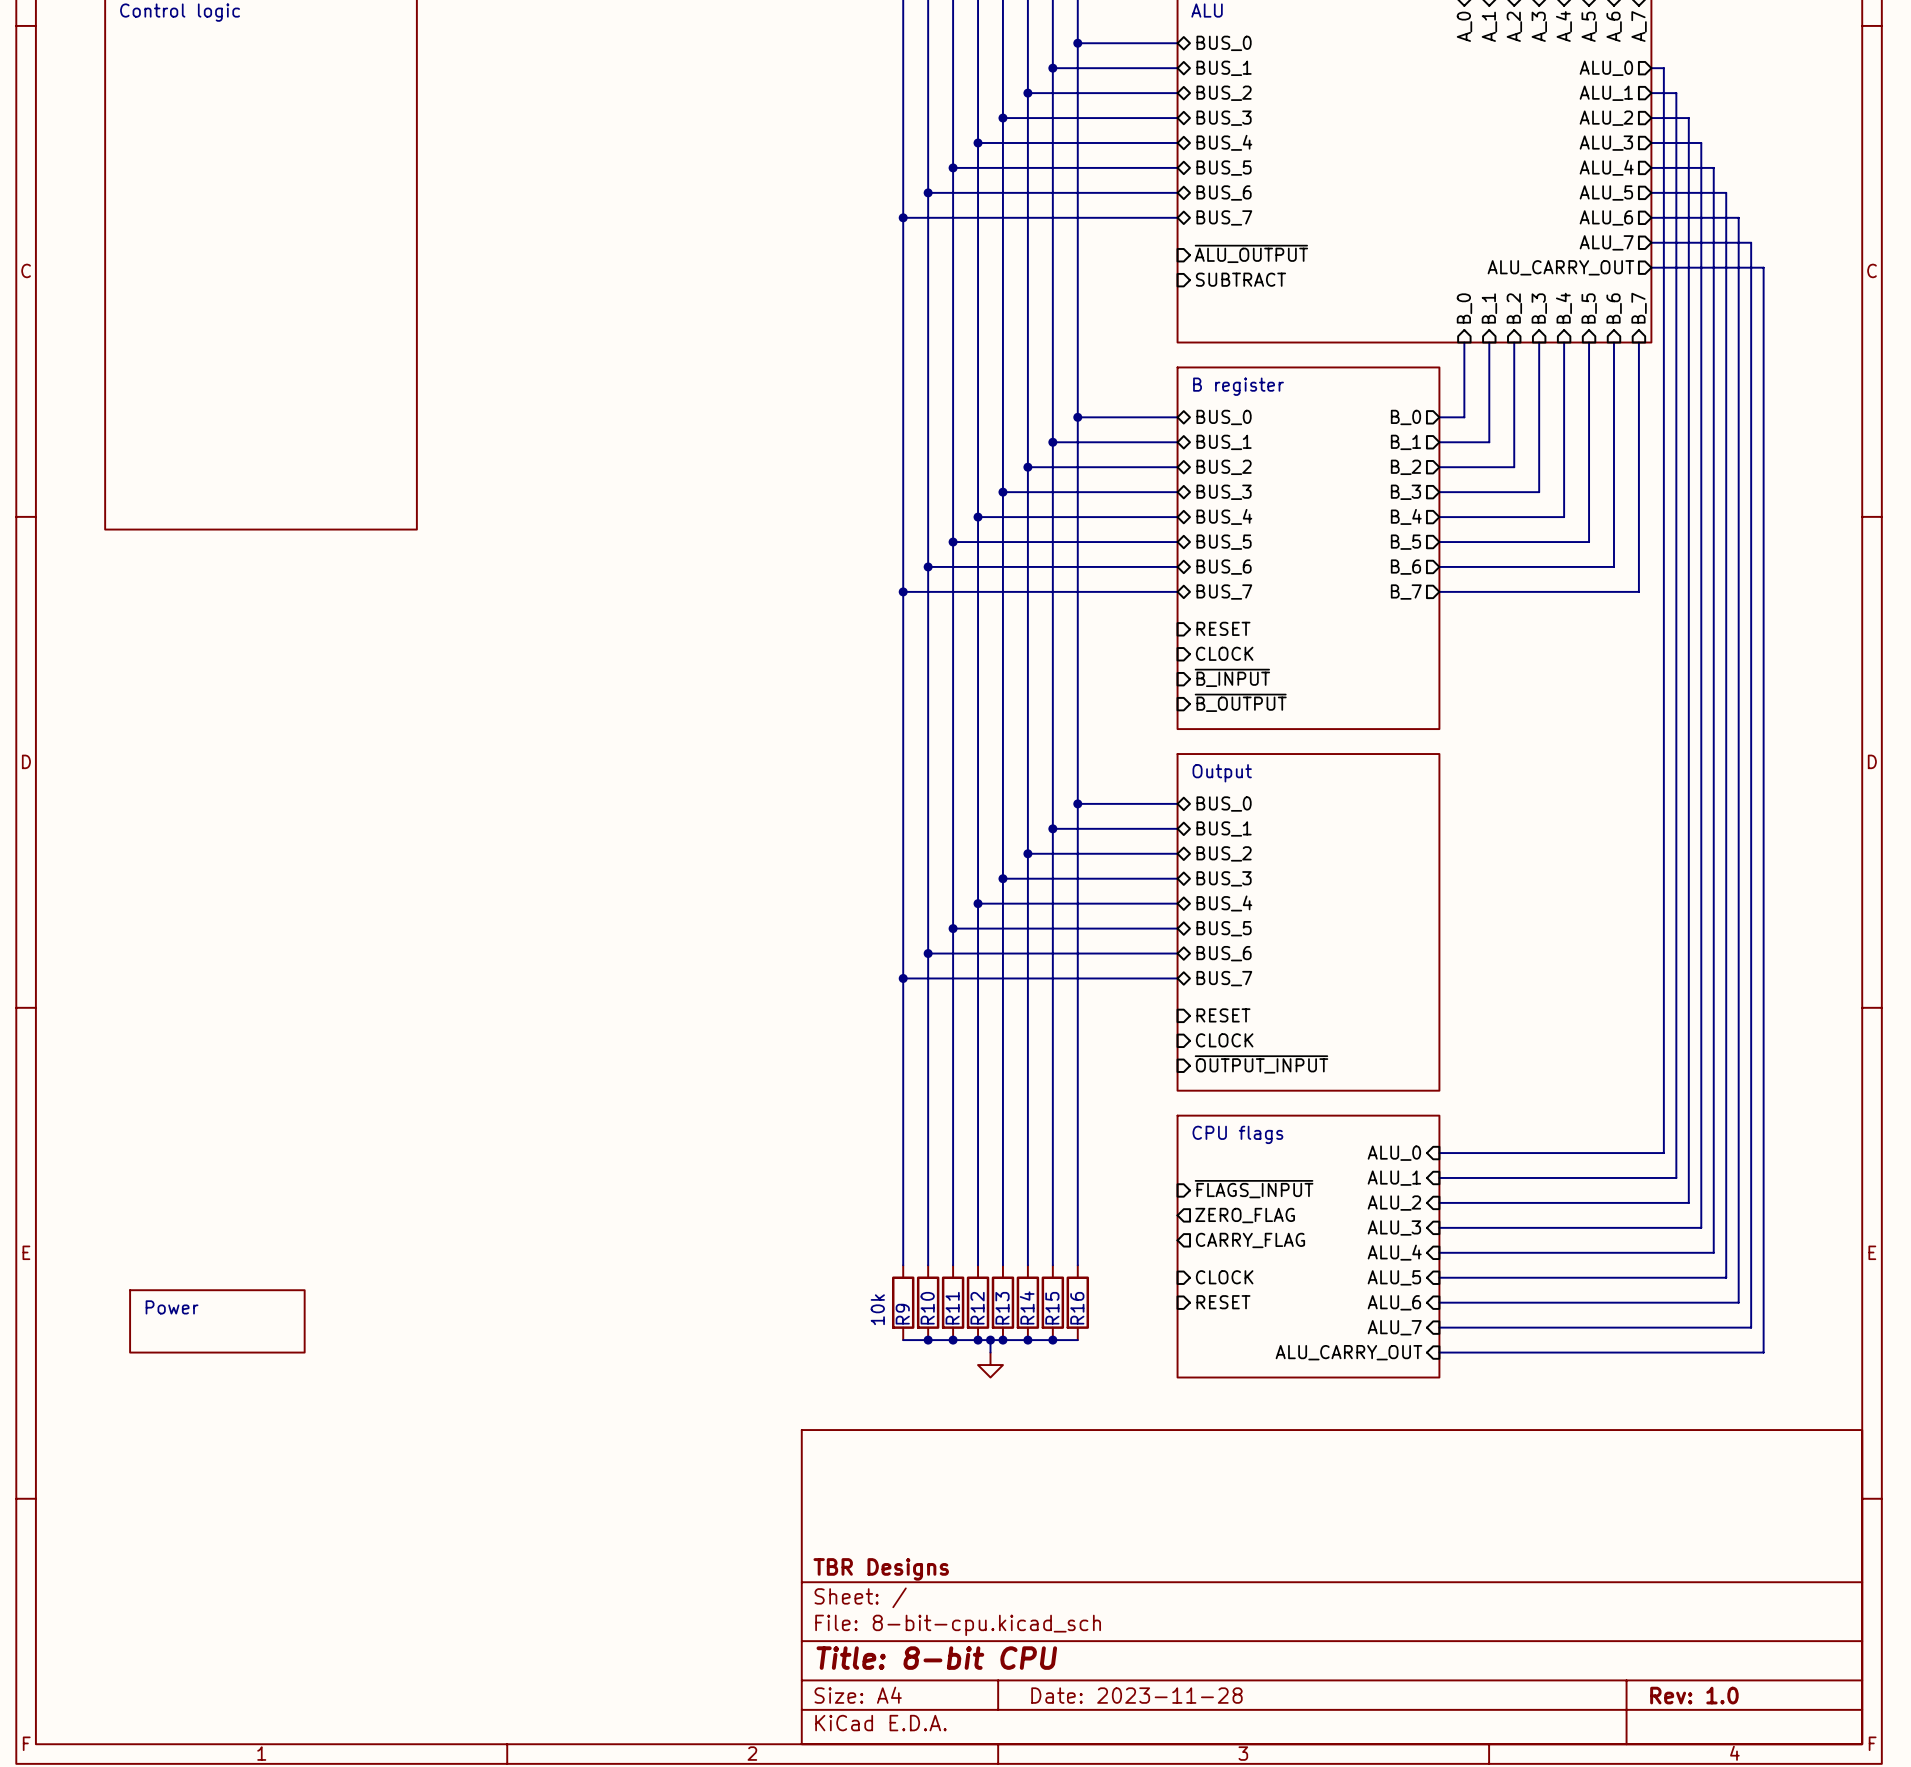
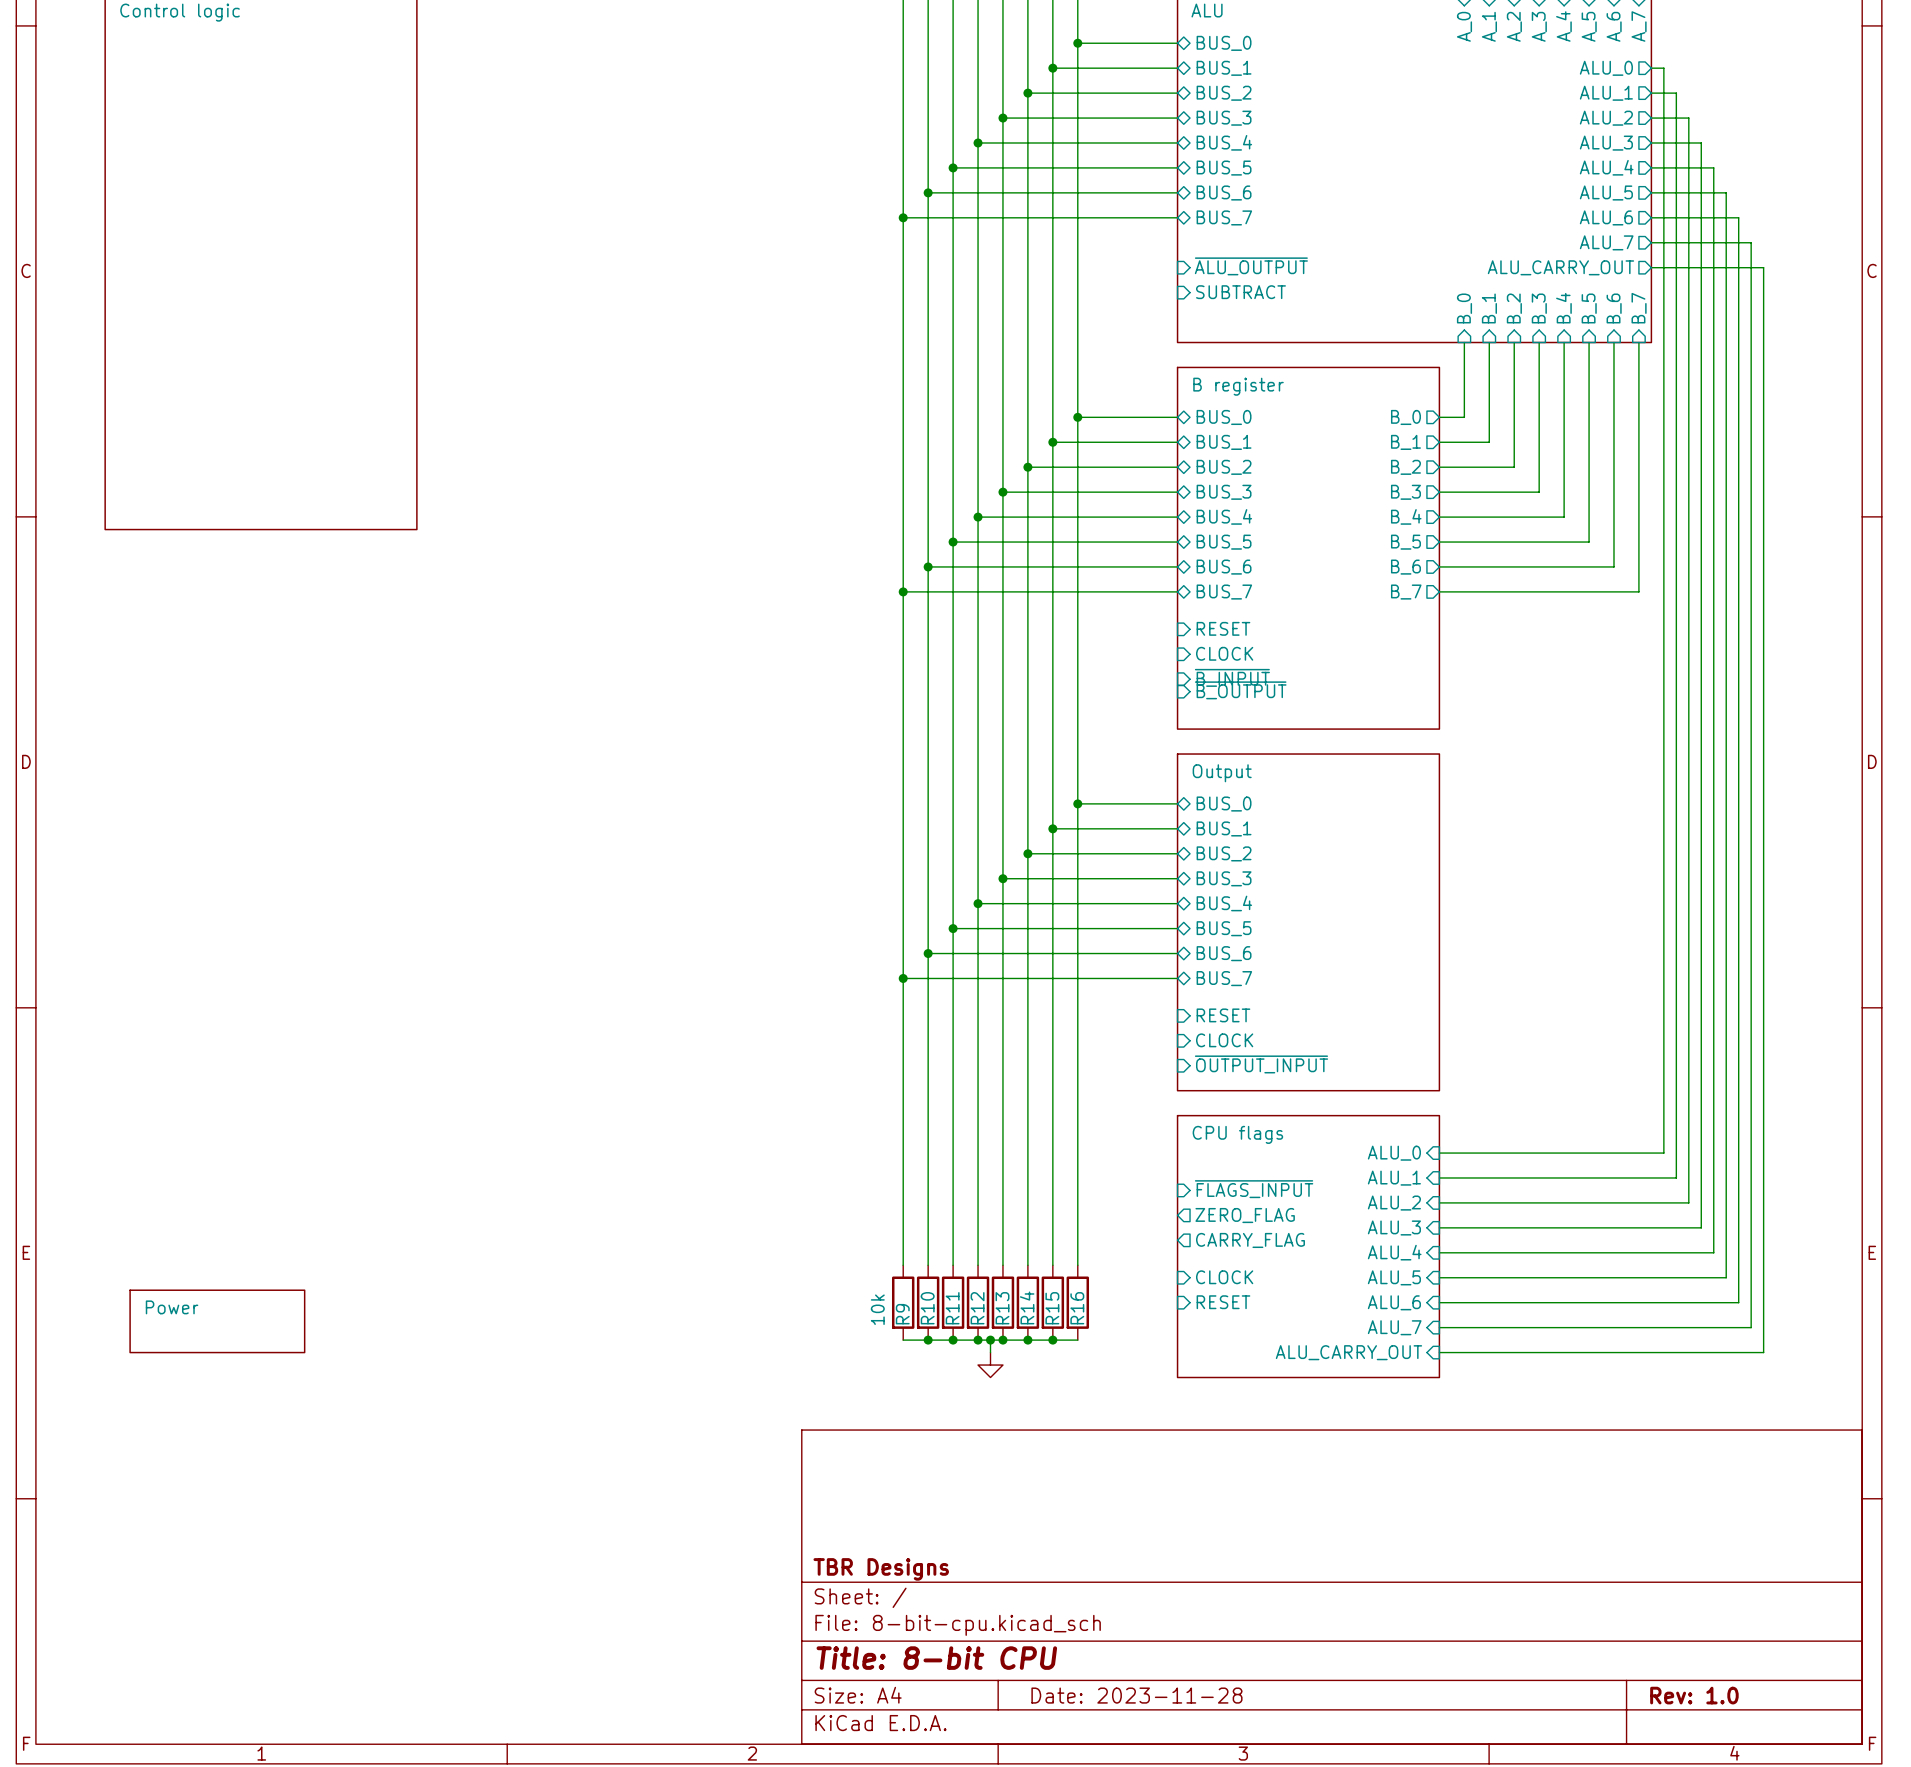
sheet pin position: ~{ALU_OUTPUT} (1251, 253) -> ~{ALU_OUTPUT} (1251, 266)
sheet pin position: SUBTRACT (1240, 279) -> SUBTRACT (1240, 292)
sheet pin position: ~{B_OUTPUT} (1240, 702) -> ~{B_OUTPUT} (1240, 690)

